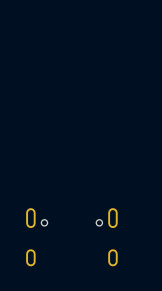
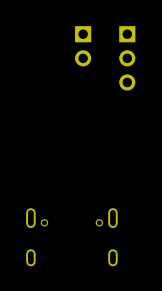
part: none -> (83, 46)
part: none -> (127, 58)

